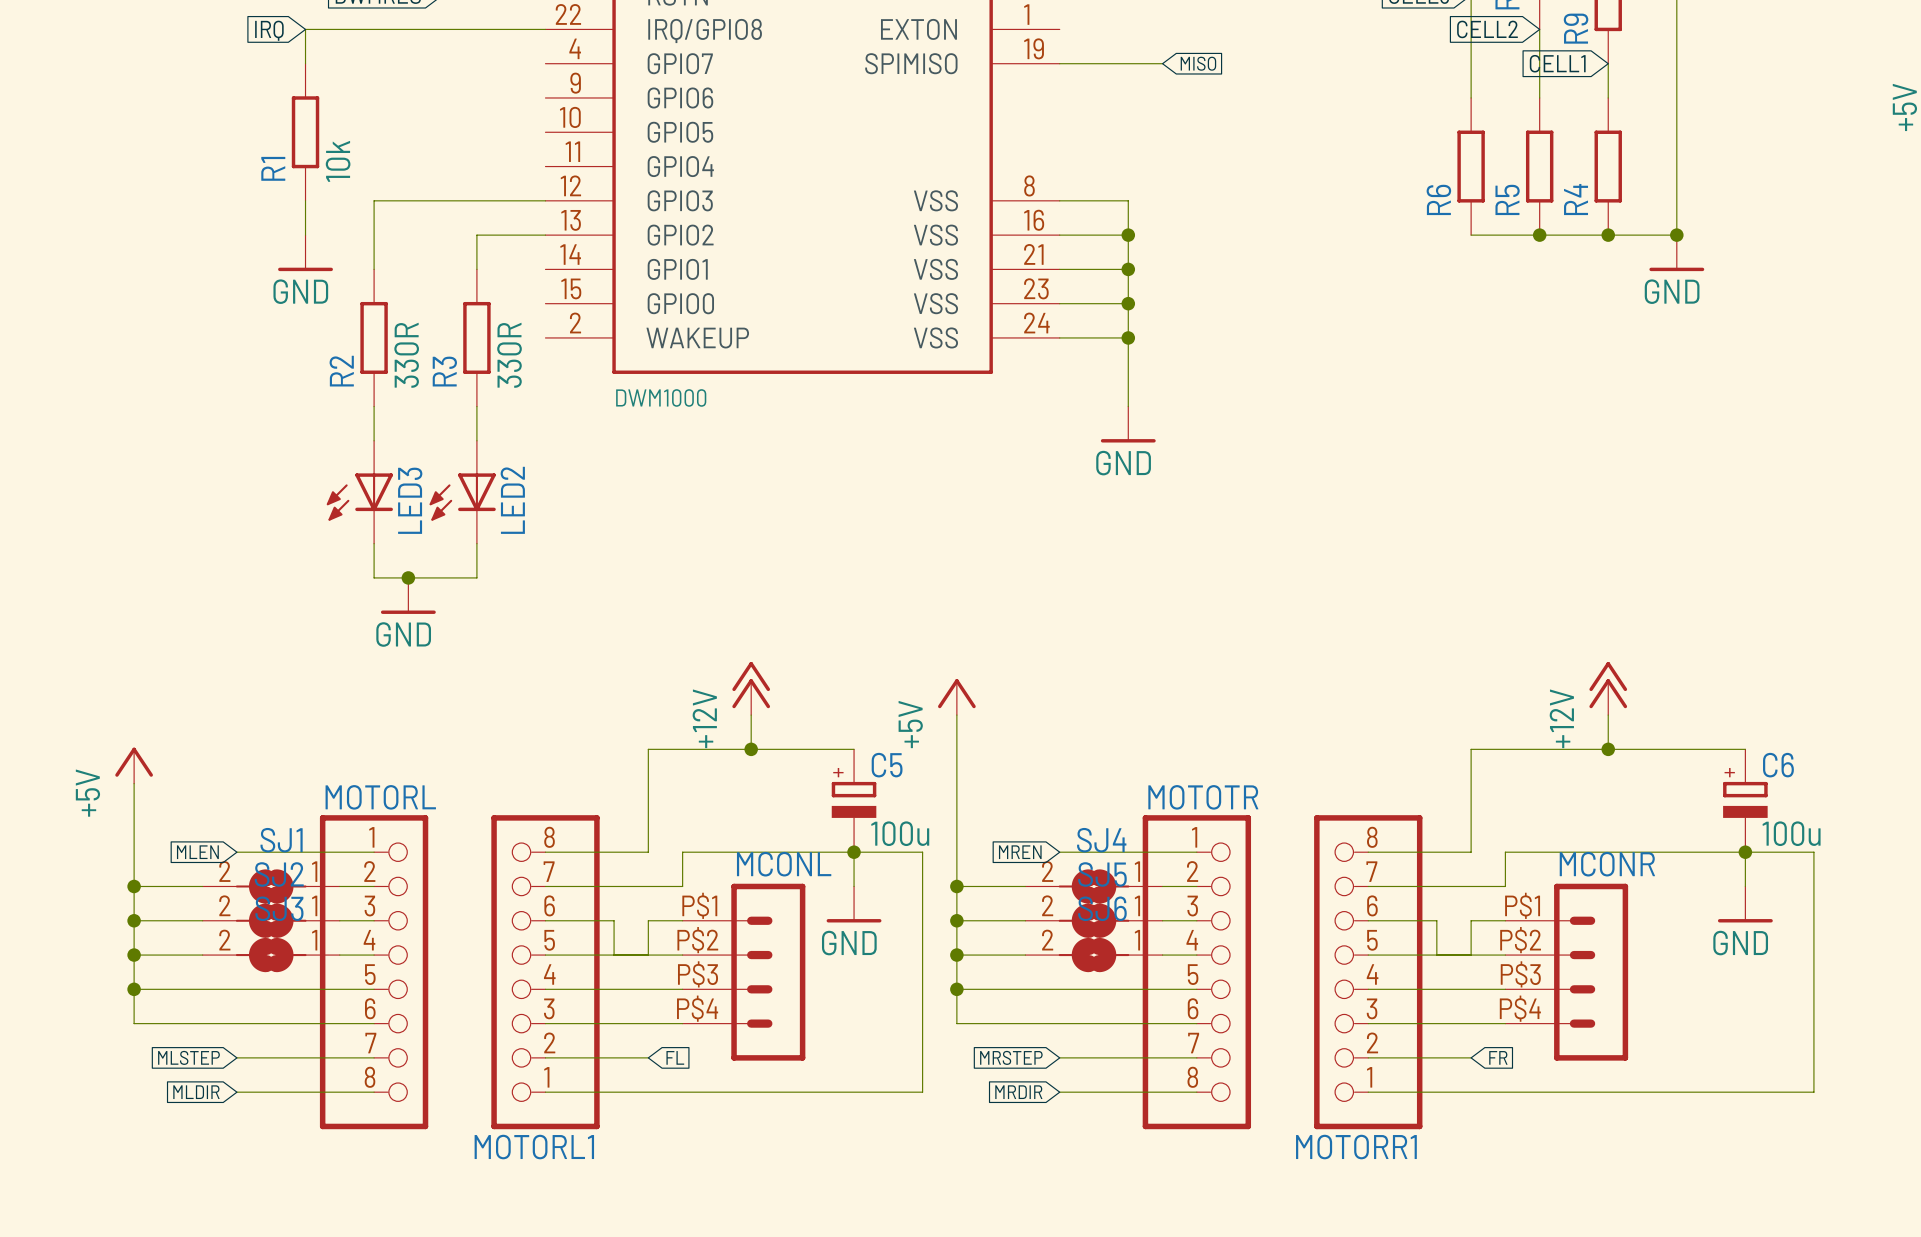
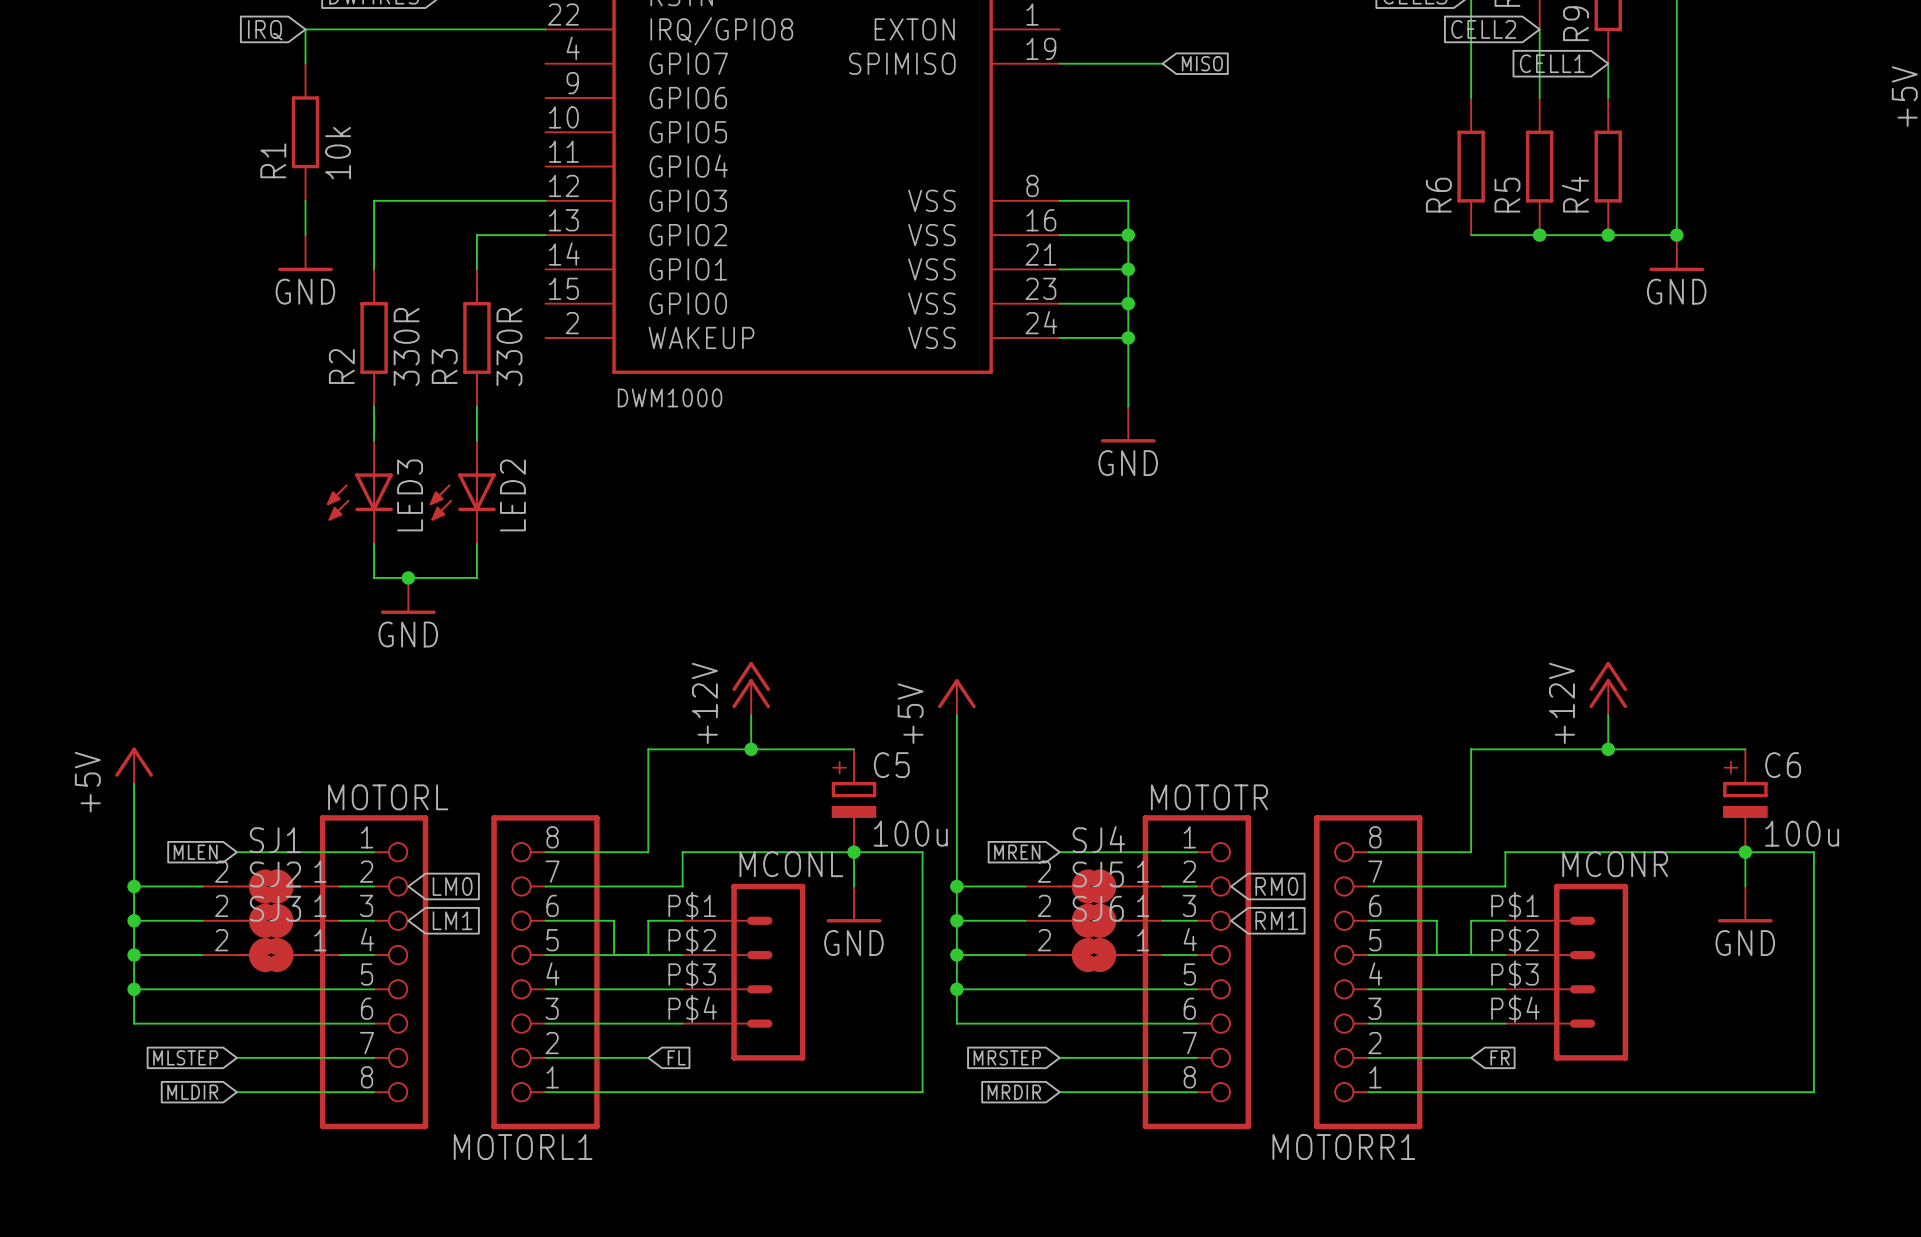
global label: none -> LM0 (452, 886)
global label: none -> RM0 (1276, 886)
global label: none -> LM1 (452, 920)
global label: none -> RM1 (1276, 920)

